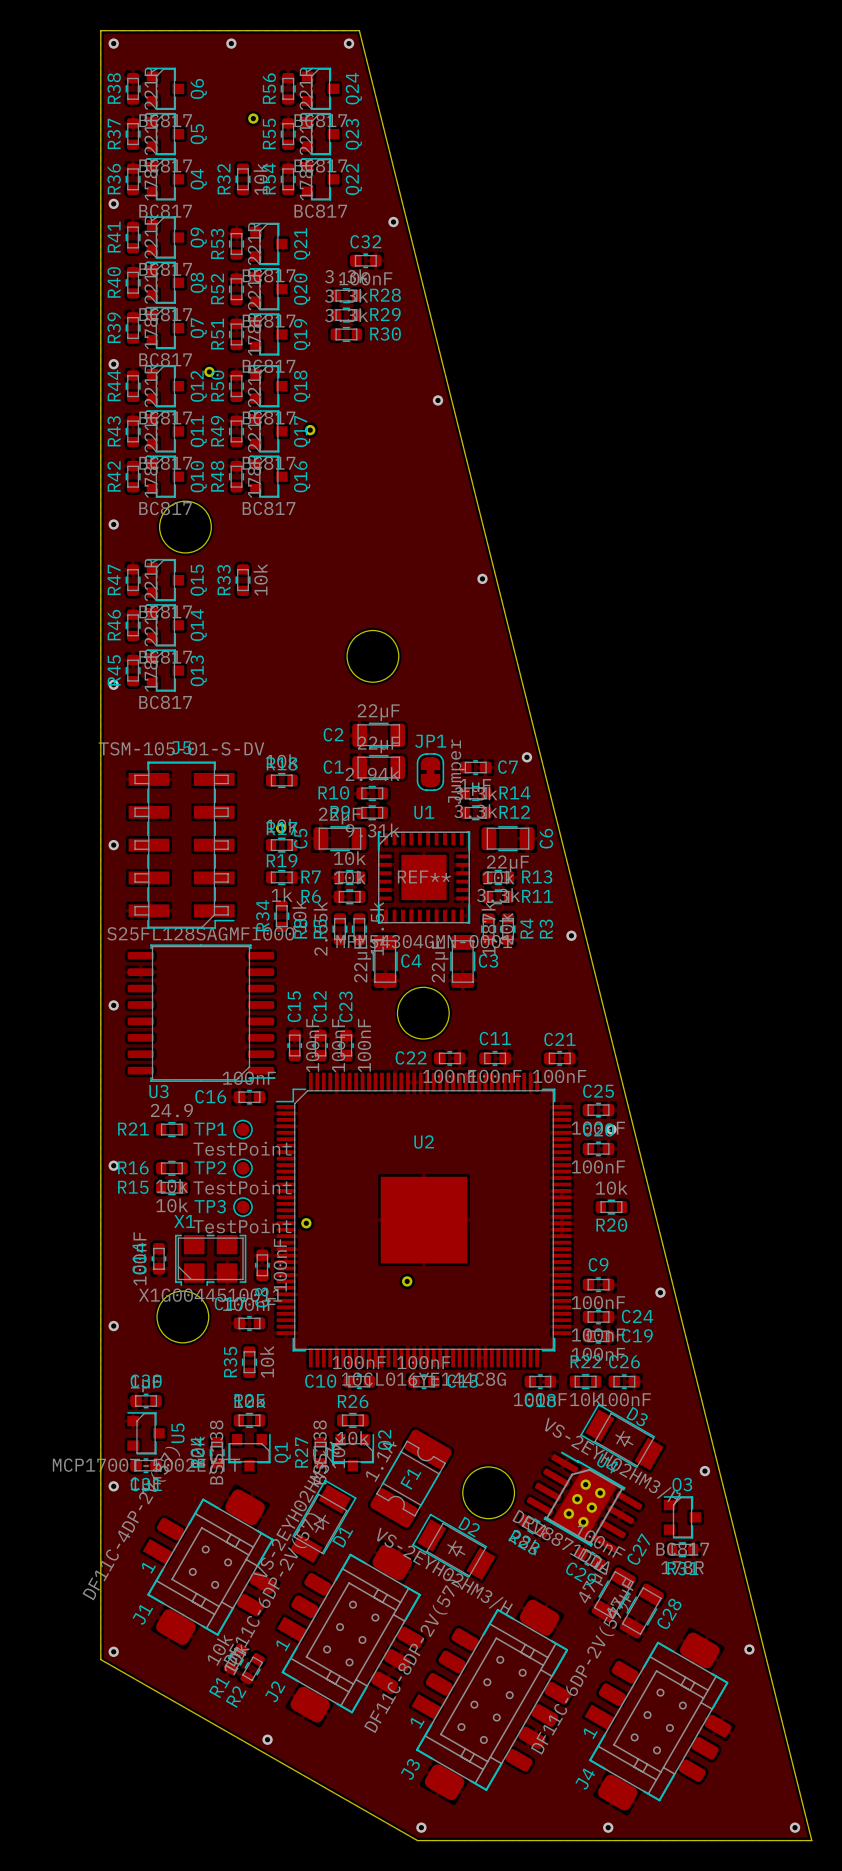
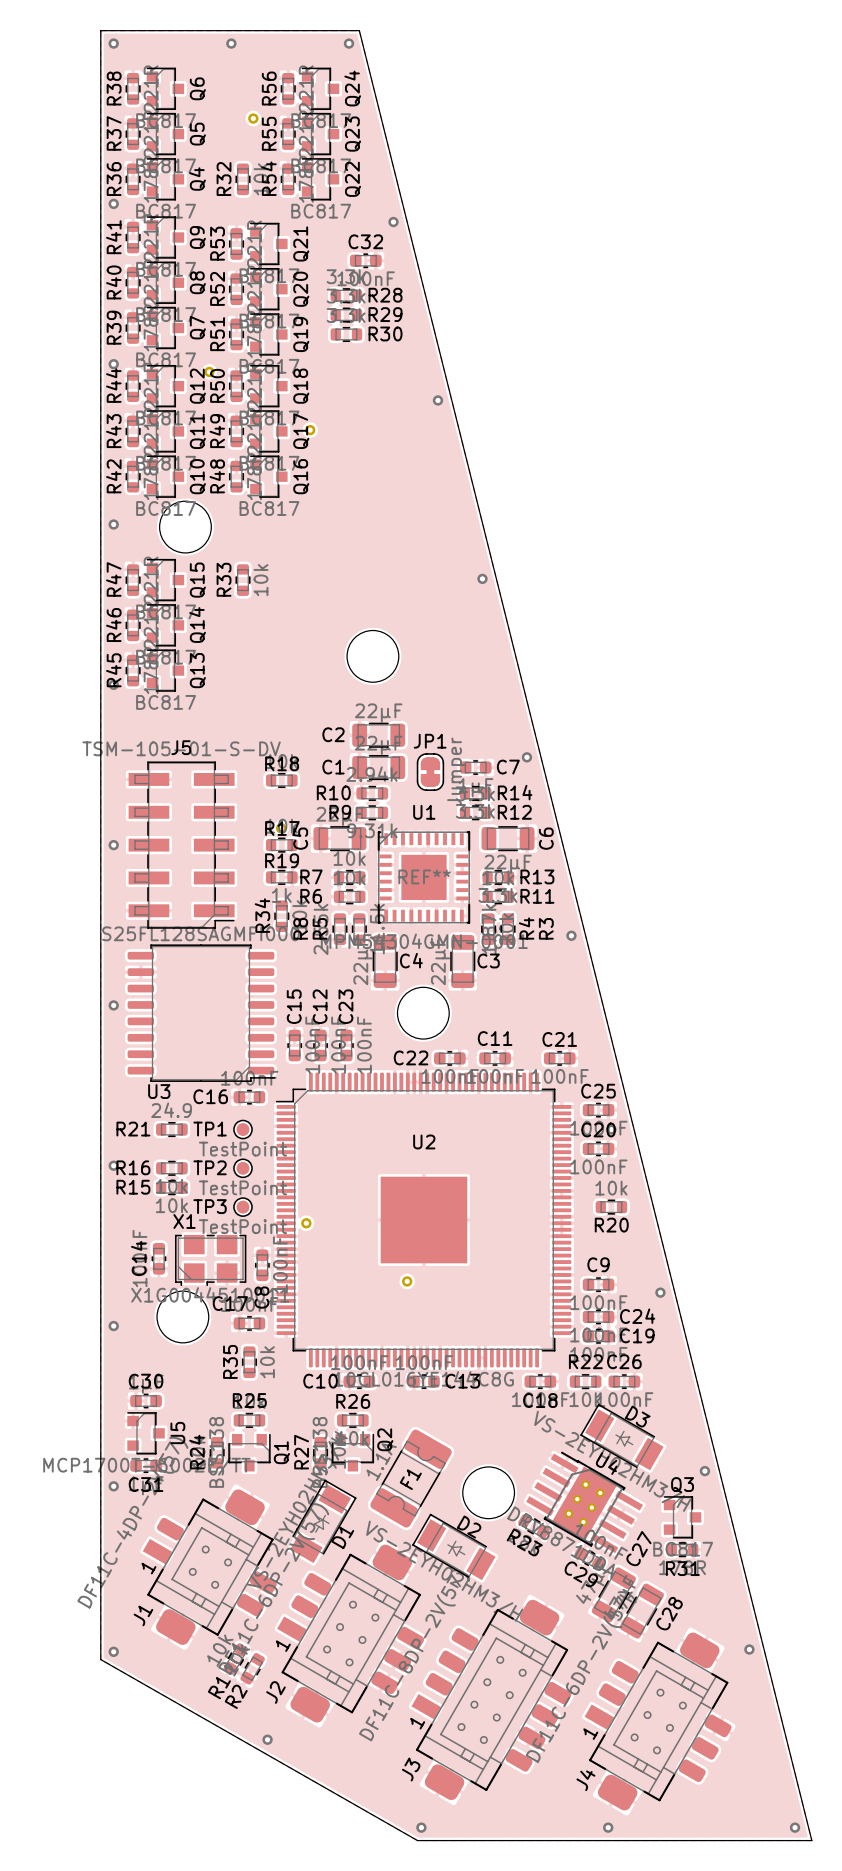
U4 footprint: [526, 1451, 643, 1553] -> [526, 1451, 644, 1554]

